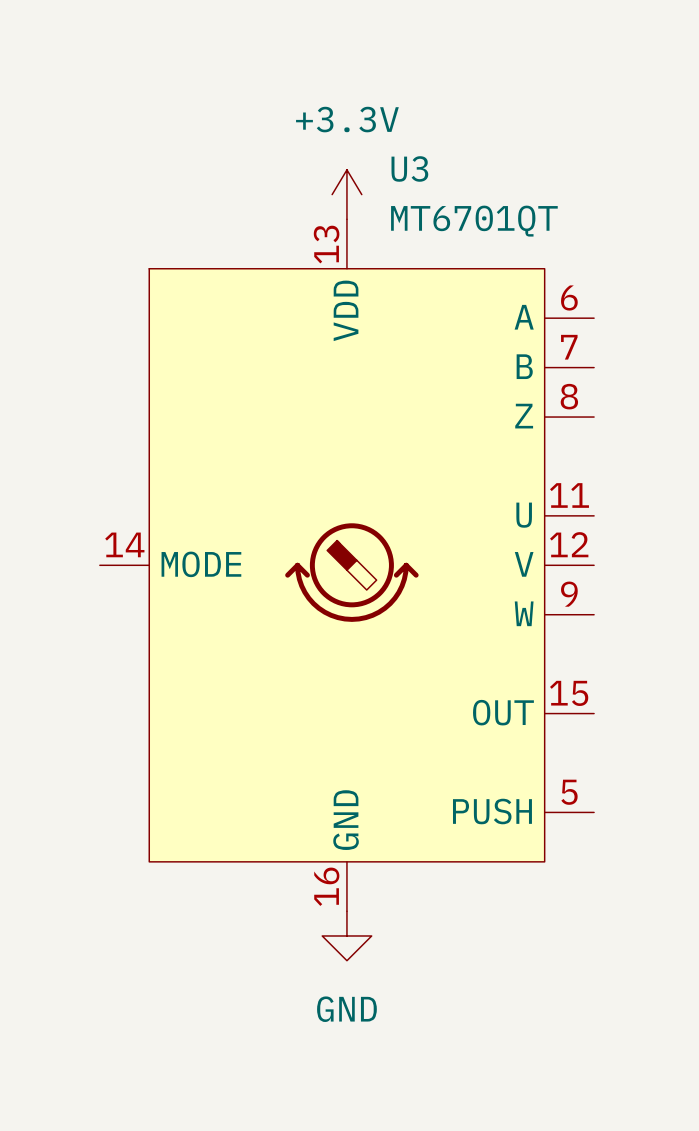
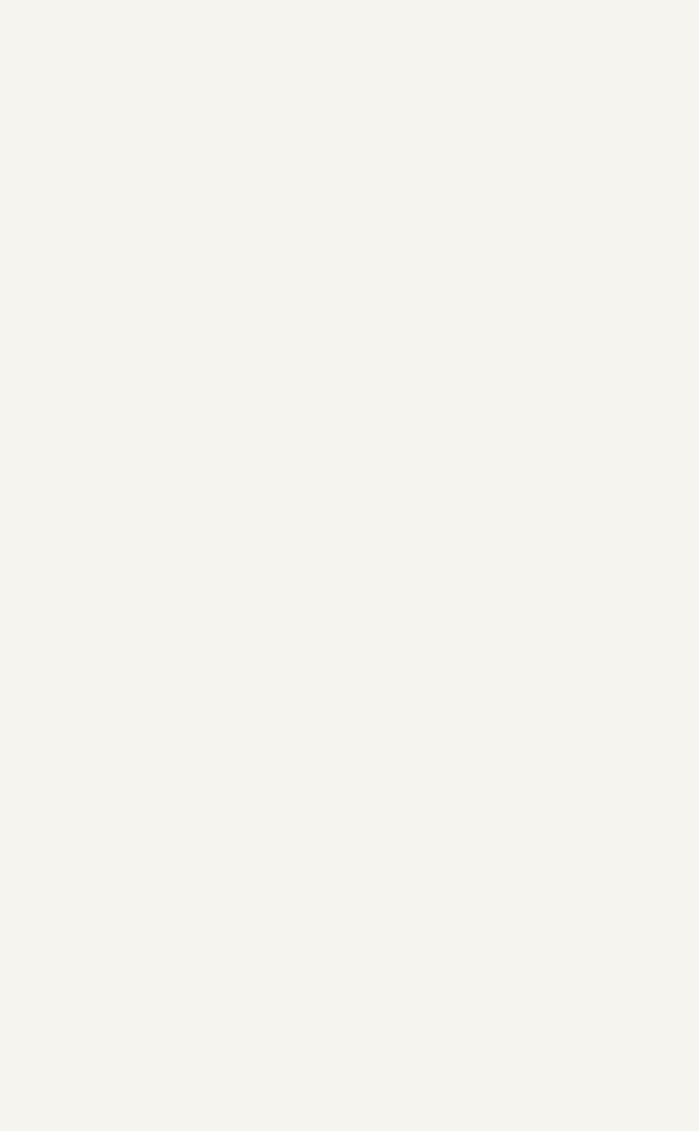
power symbol: +3.3V (346, 194) -> none
U3: MT6701QT (346, 565) -> none
power symbol: GND (346, 935) -> none

